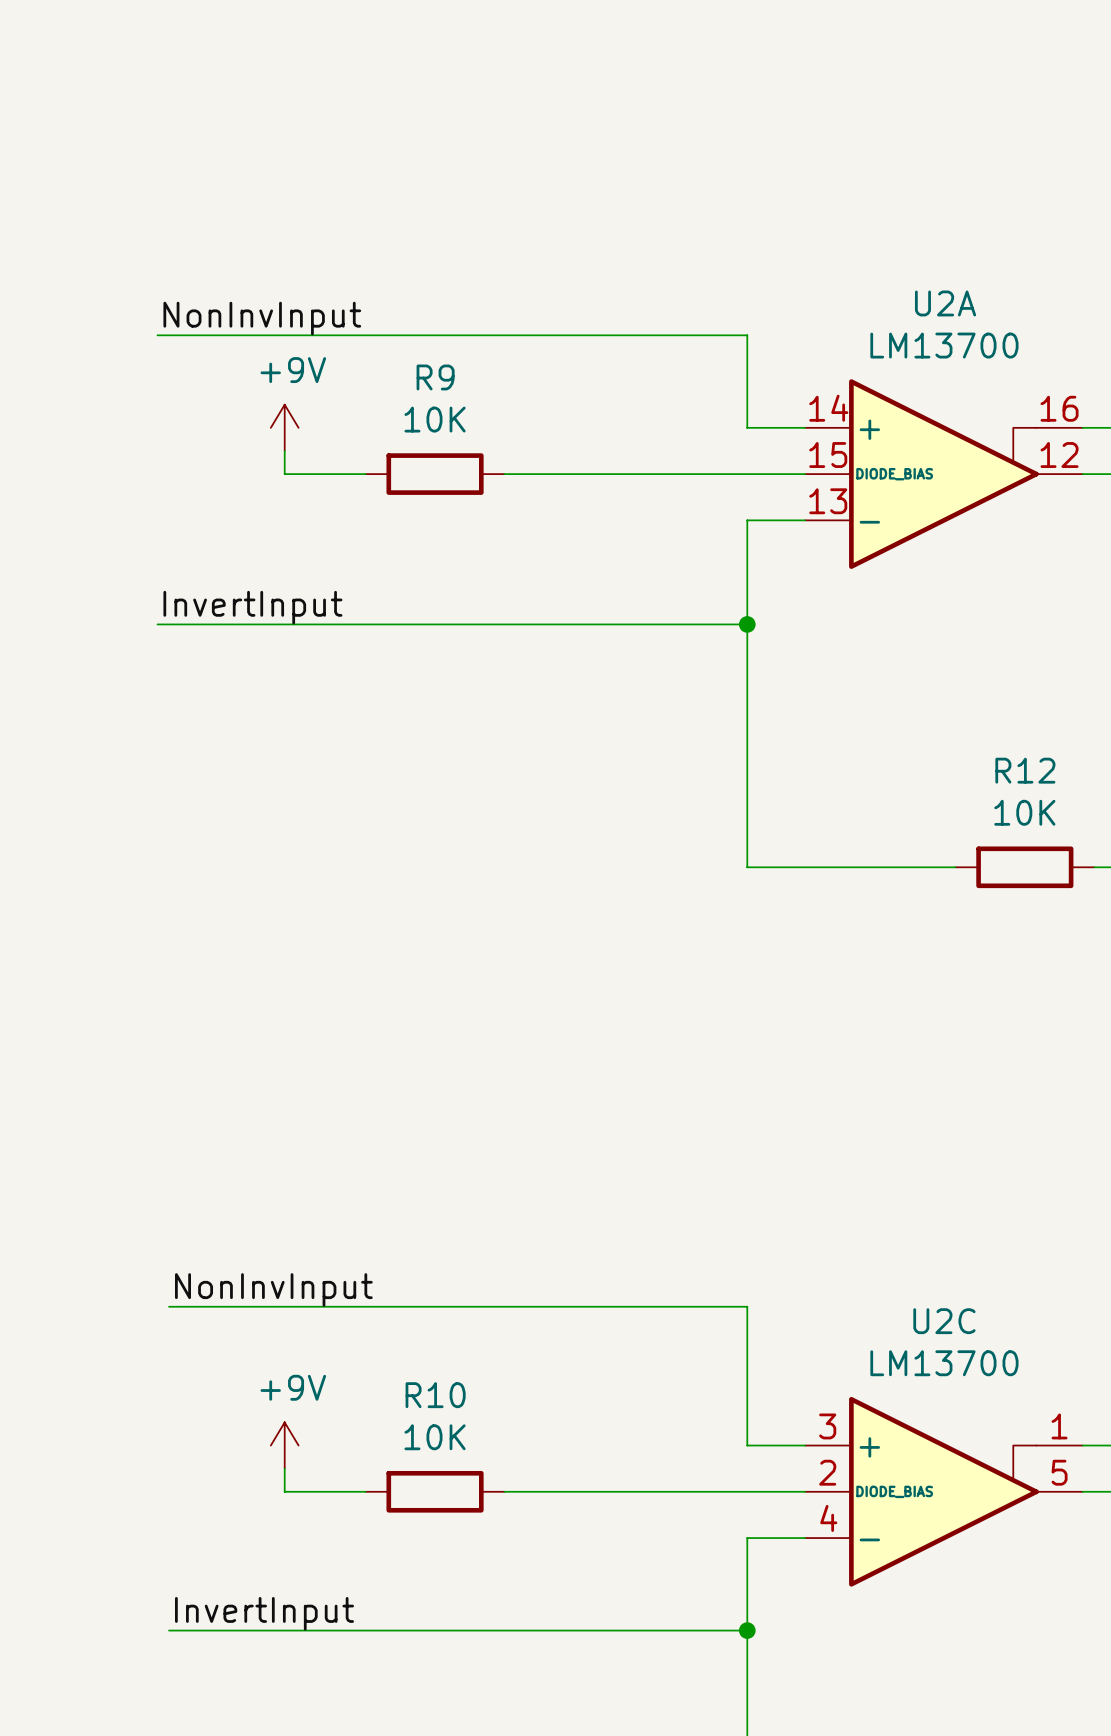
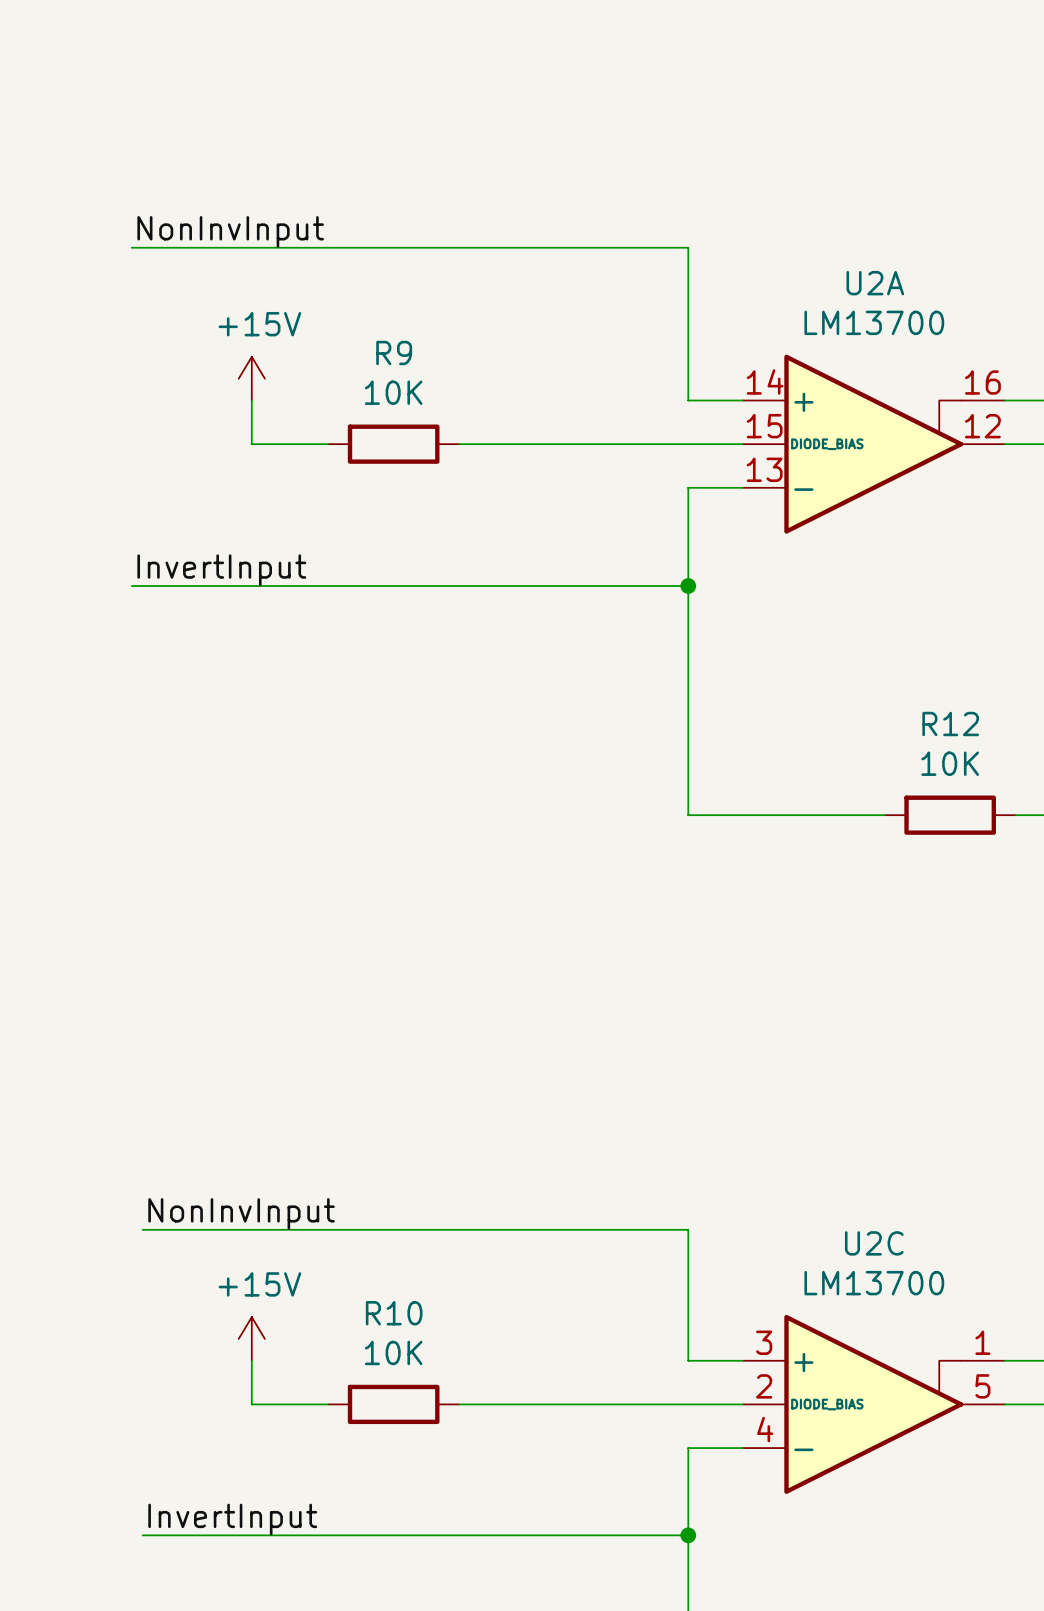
label position: NonInvInput (262, 318) -> NonInvInput (230, 231)
wire: (157, 335) (747, 335) -> (131, 247) (688, 247) (688, 313)
power symbol: none -> +15V (251, 378)
power symbol: +9V (284, 427) -> none
power symbol: none -> +15V (251, 1338)
power symbol: +9V (284, 1445) -> none

